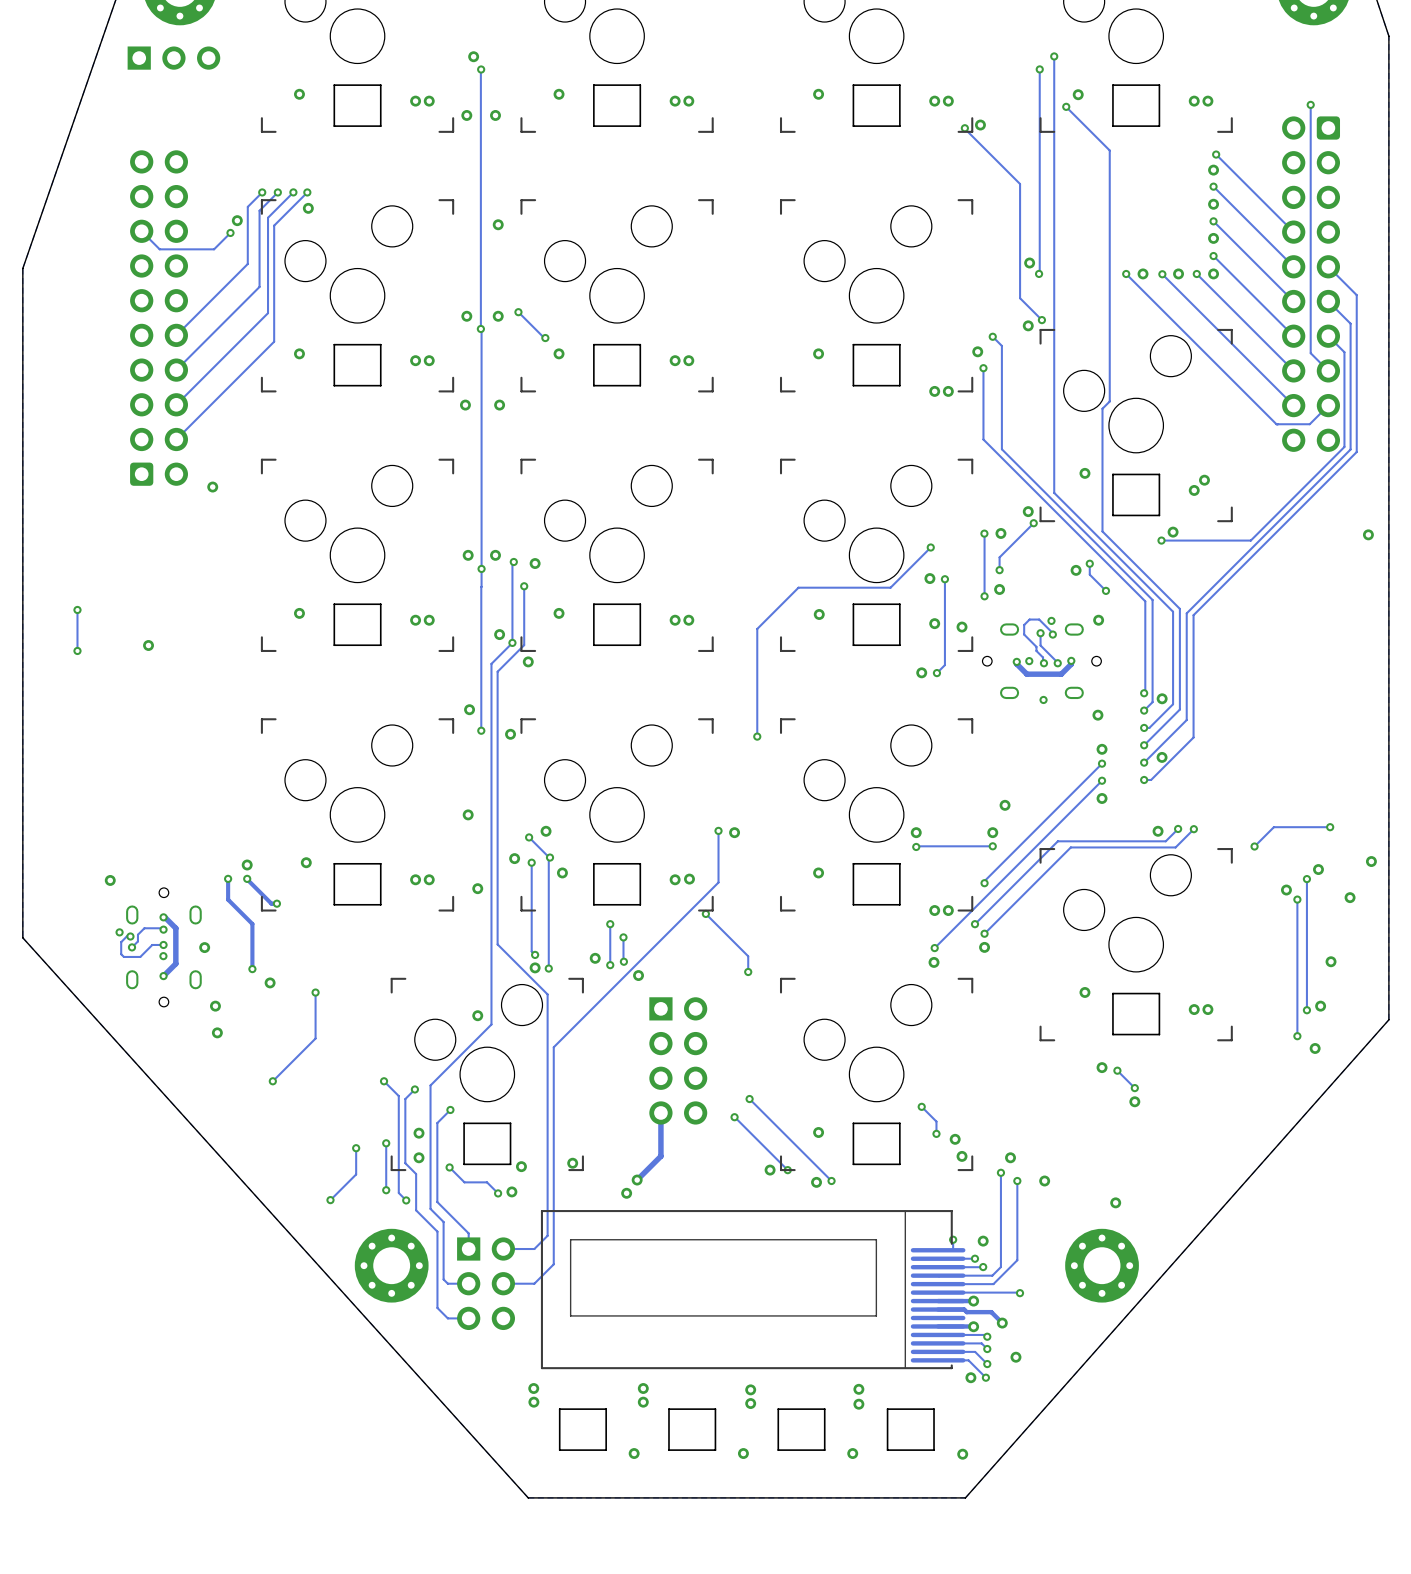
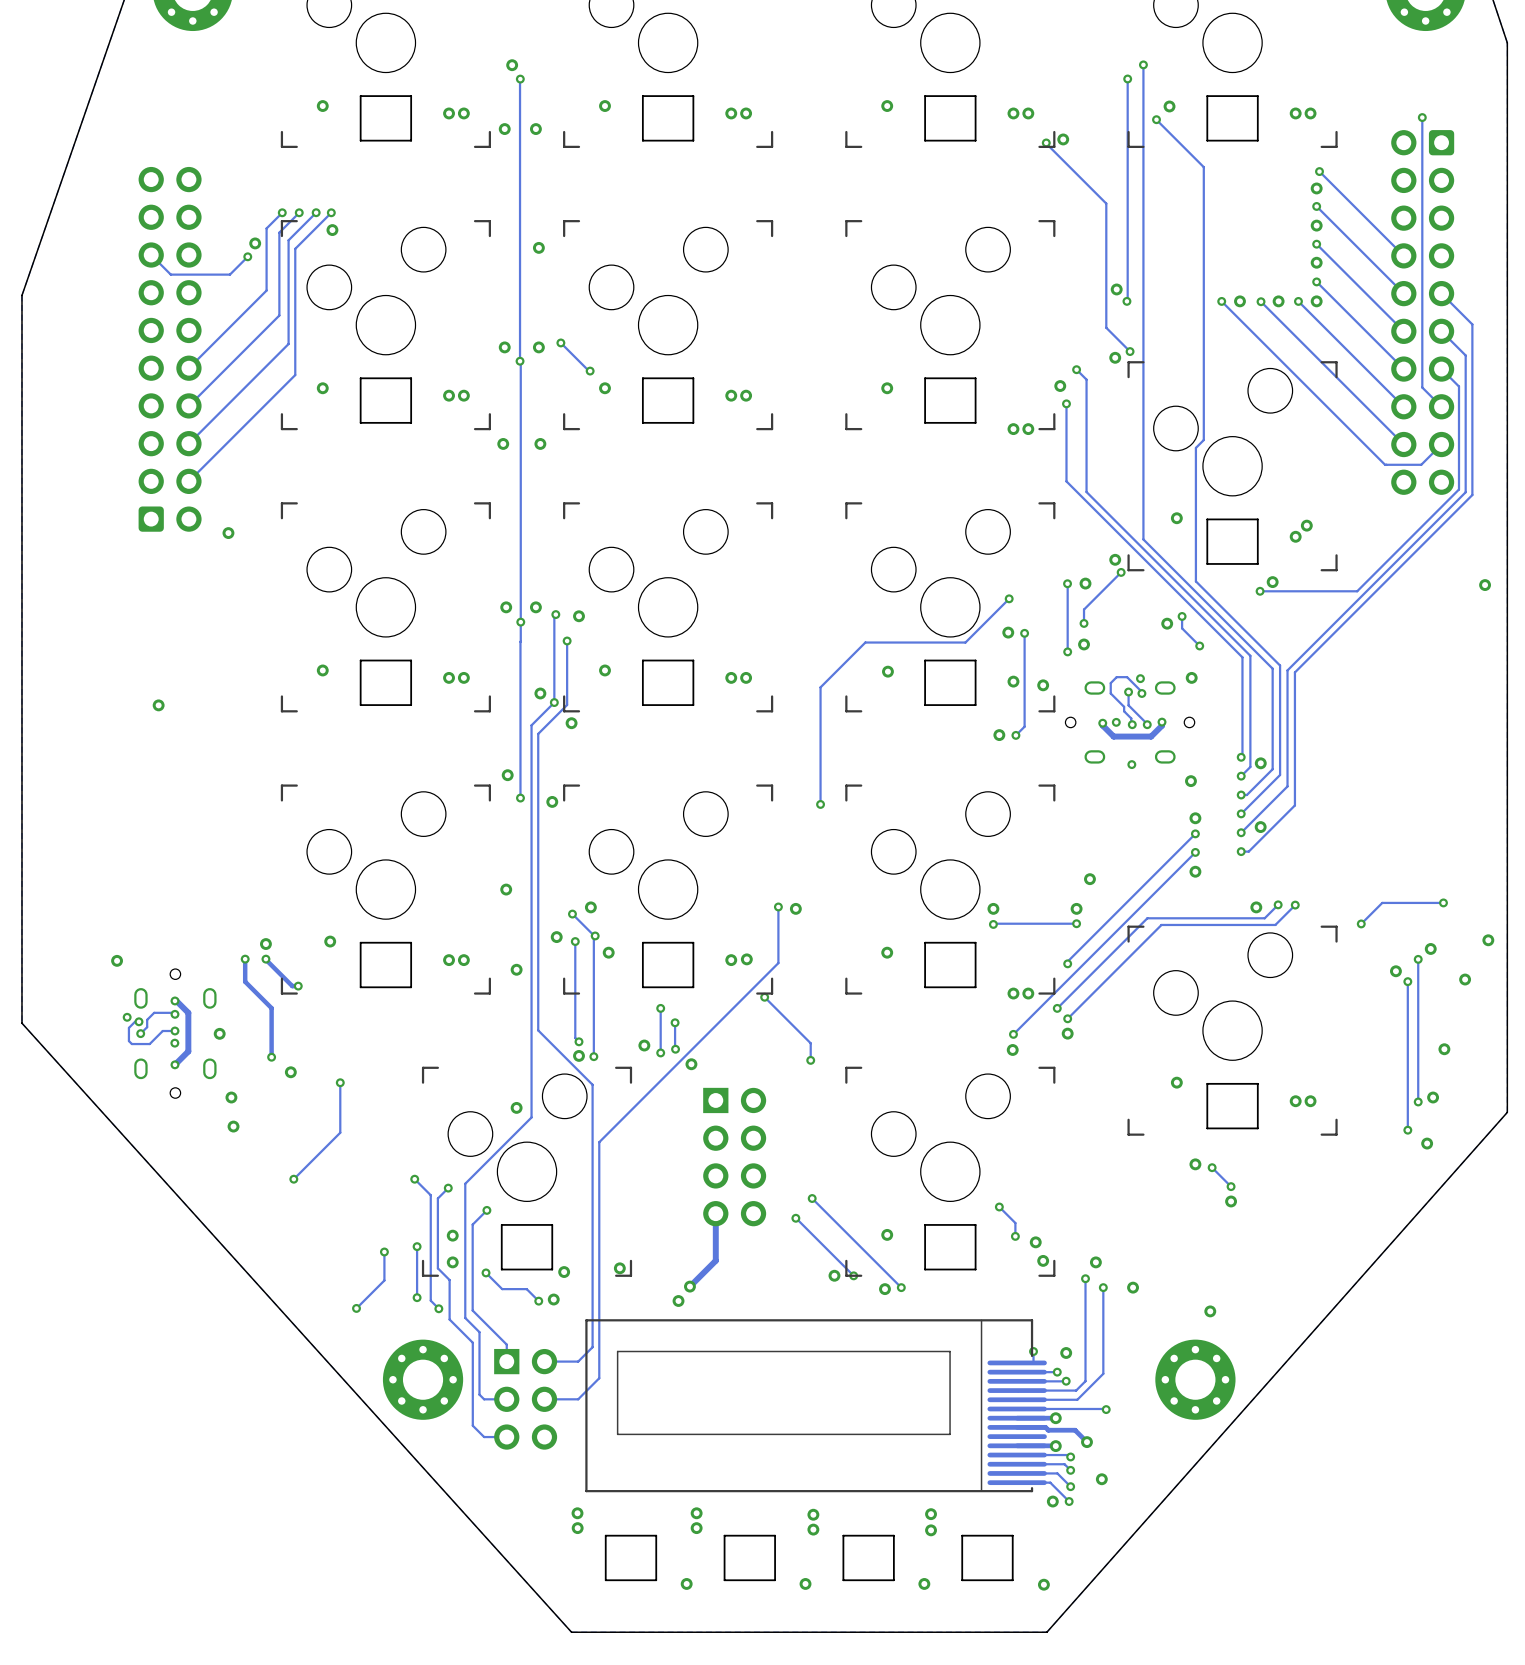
part: (173, 58) -> none
track: (77, 609) (77, 650) -> none
via: (77, 609) -> none
via: (77, 650) -> none

